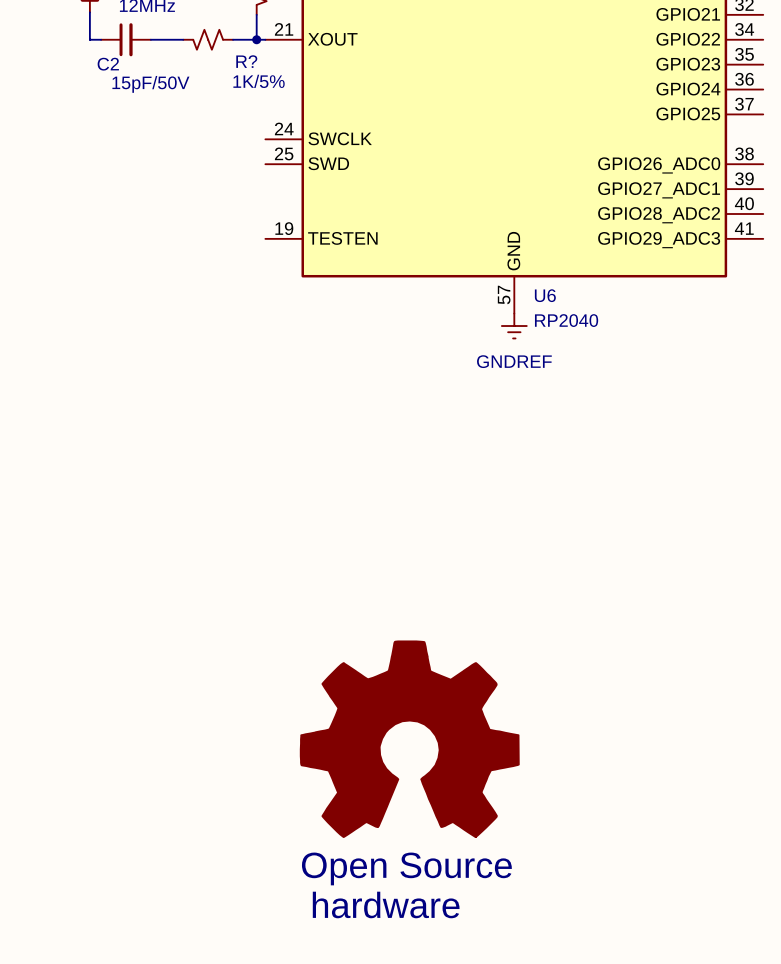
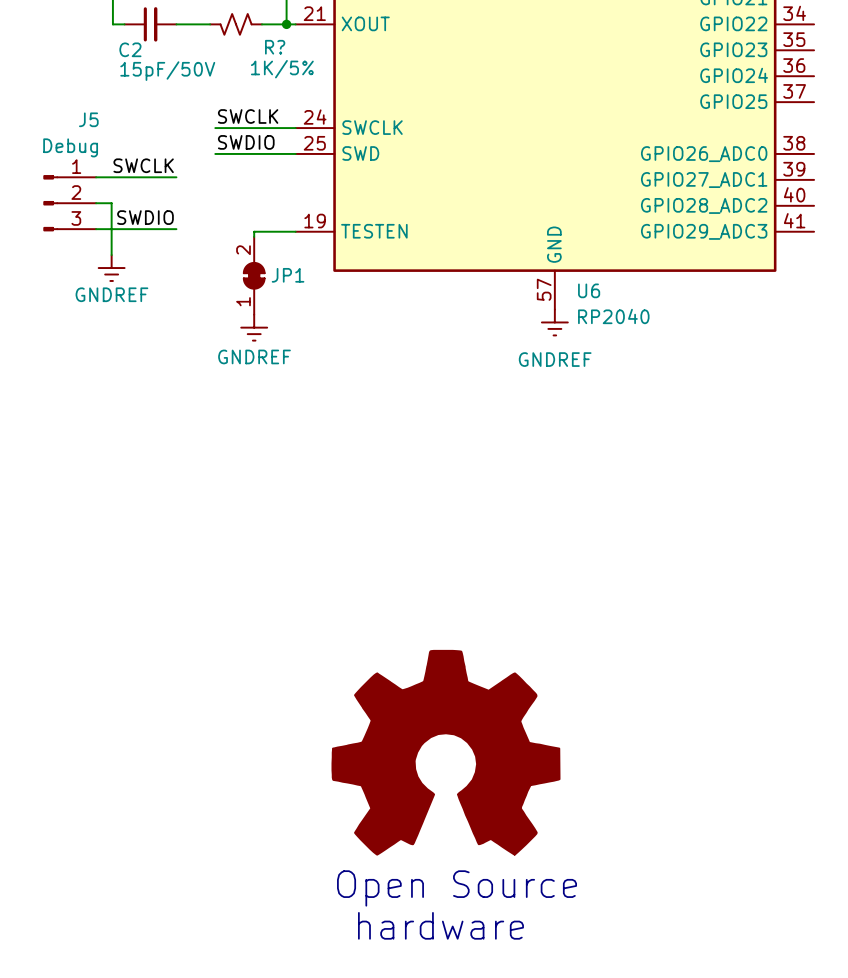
label: none -> SWCLK (248, 116)
wire: none -> (215, 128) (295, 128)
label: none -> SWDIO (246, 142)
wire: none -> (215, 153) (295, 153)
label: none -> SWCLK (143, 165)
wire: none -> (96, 177) (176, 177)
J5: none -> Debug (69, 203)
wire: none -> (96, 203) (111, 203) (111, 255)
label: none -> SWDIO (145, 217)
wire: none -> (96, 229) (176, 229)
wire: none -> (295, 231) (254, 231) (254, 236)
power symbol: none -> GNDREF (111, 268)
JP1: none -> (254, 275)
power symbol: none -> GNDREF (254, 327)

